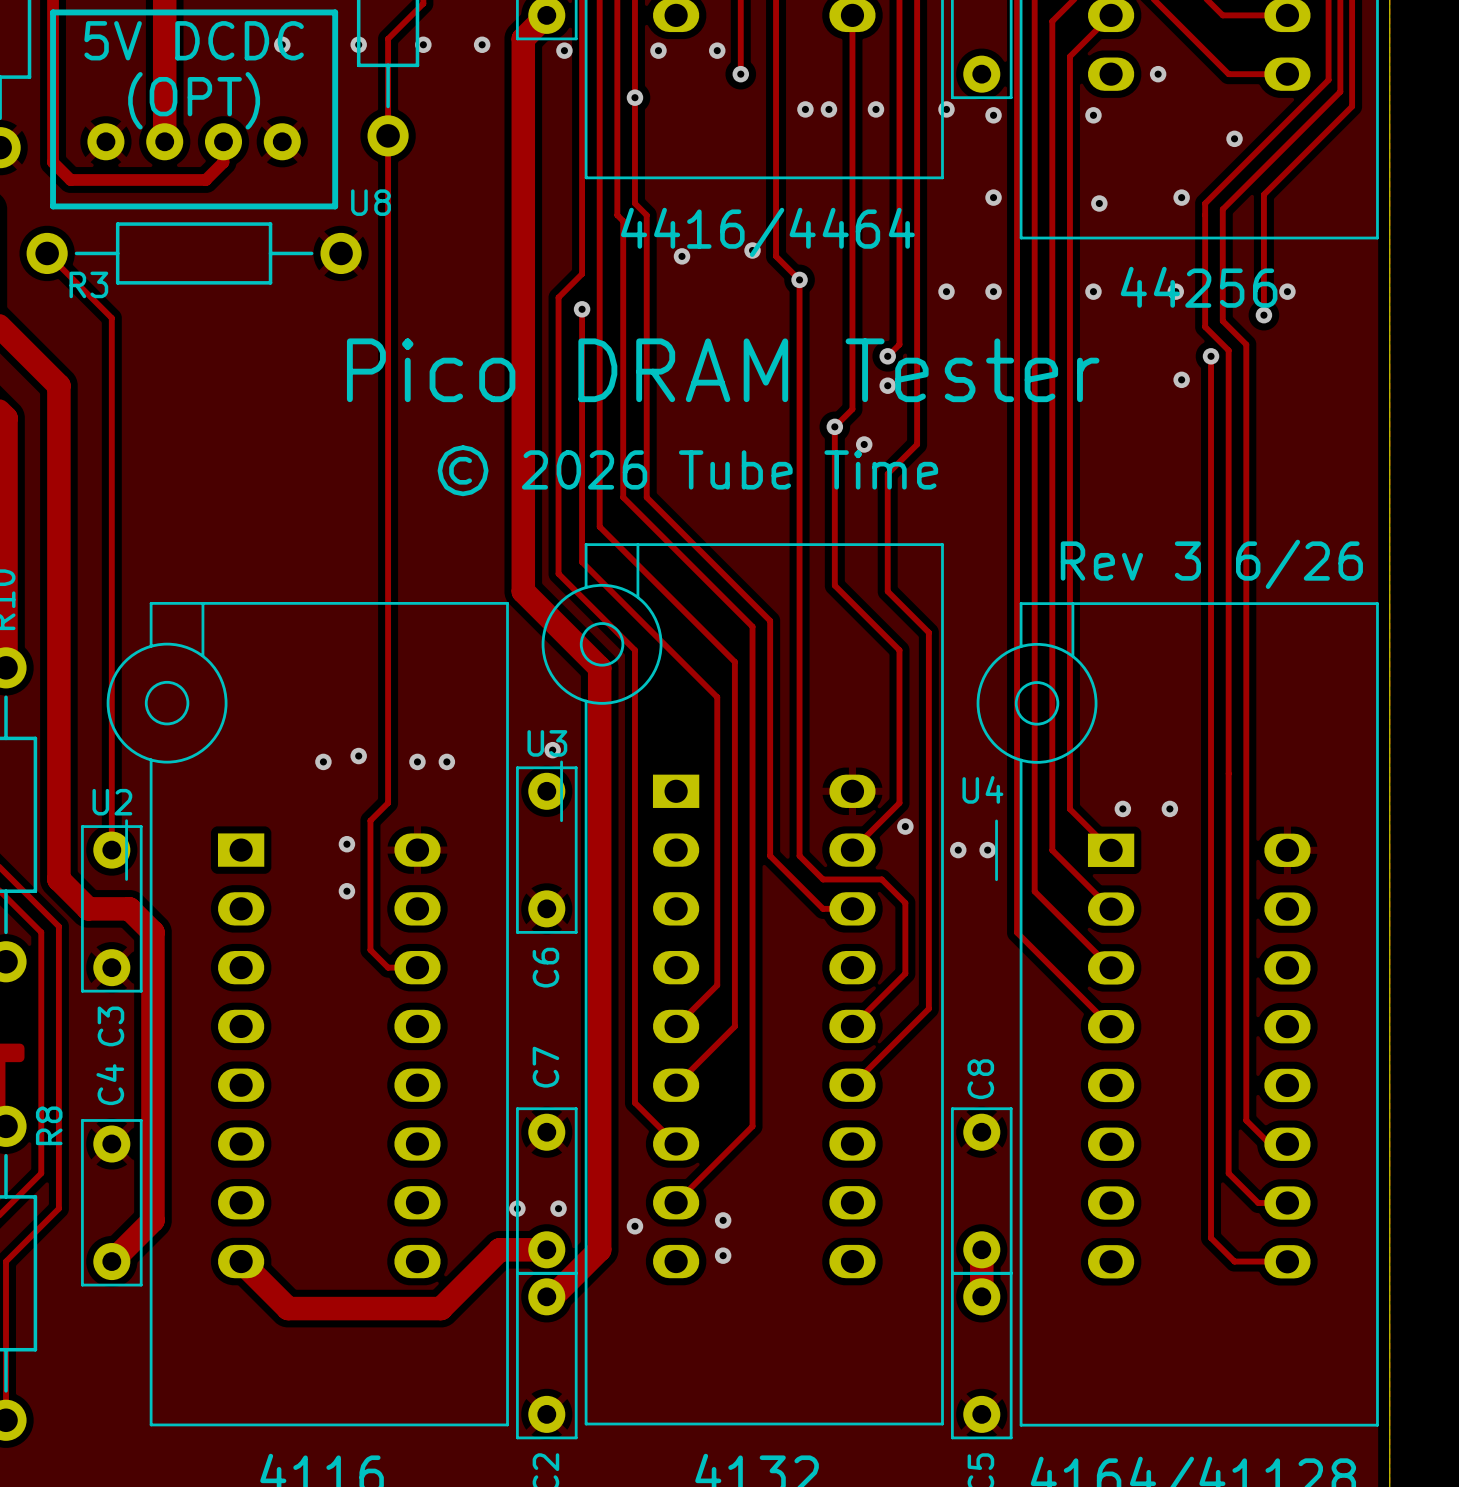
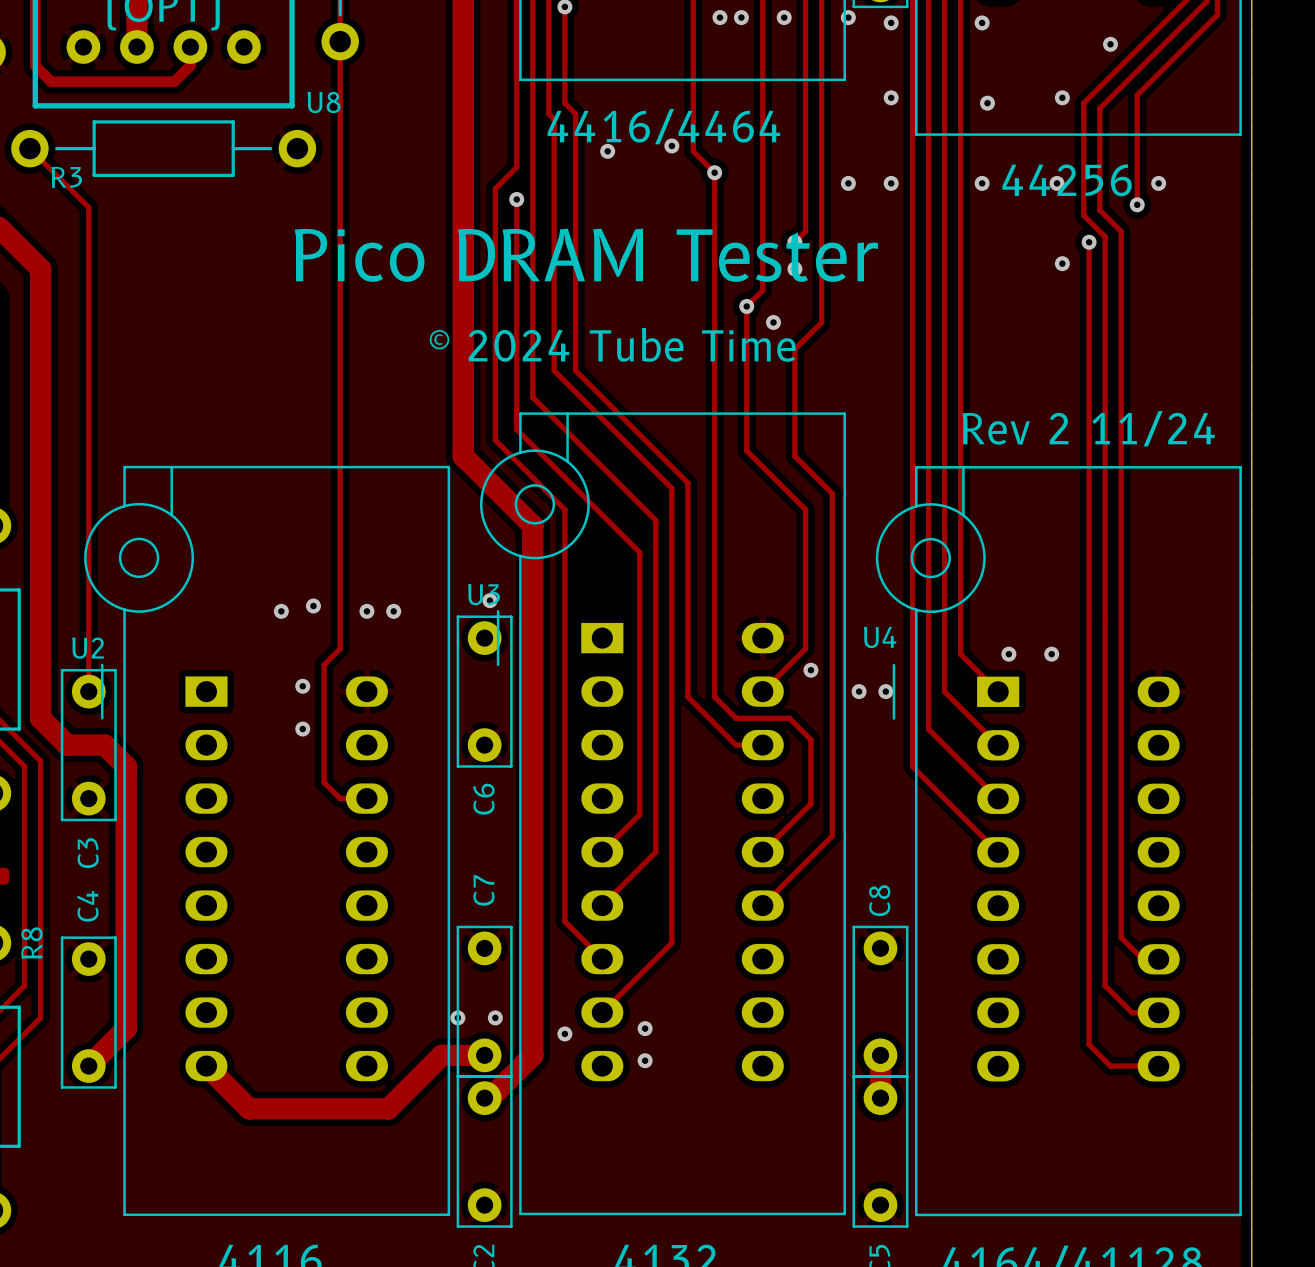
text: © 2026 Tube Time (687, 470) -> © 2024 Tube Time (612, 344)
text: Rev 3 6/26 (1211, 564) -> Rev 2 11/24 (1088, 428)

